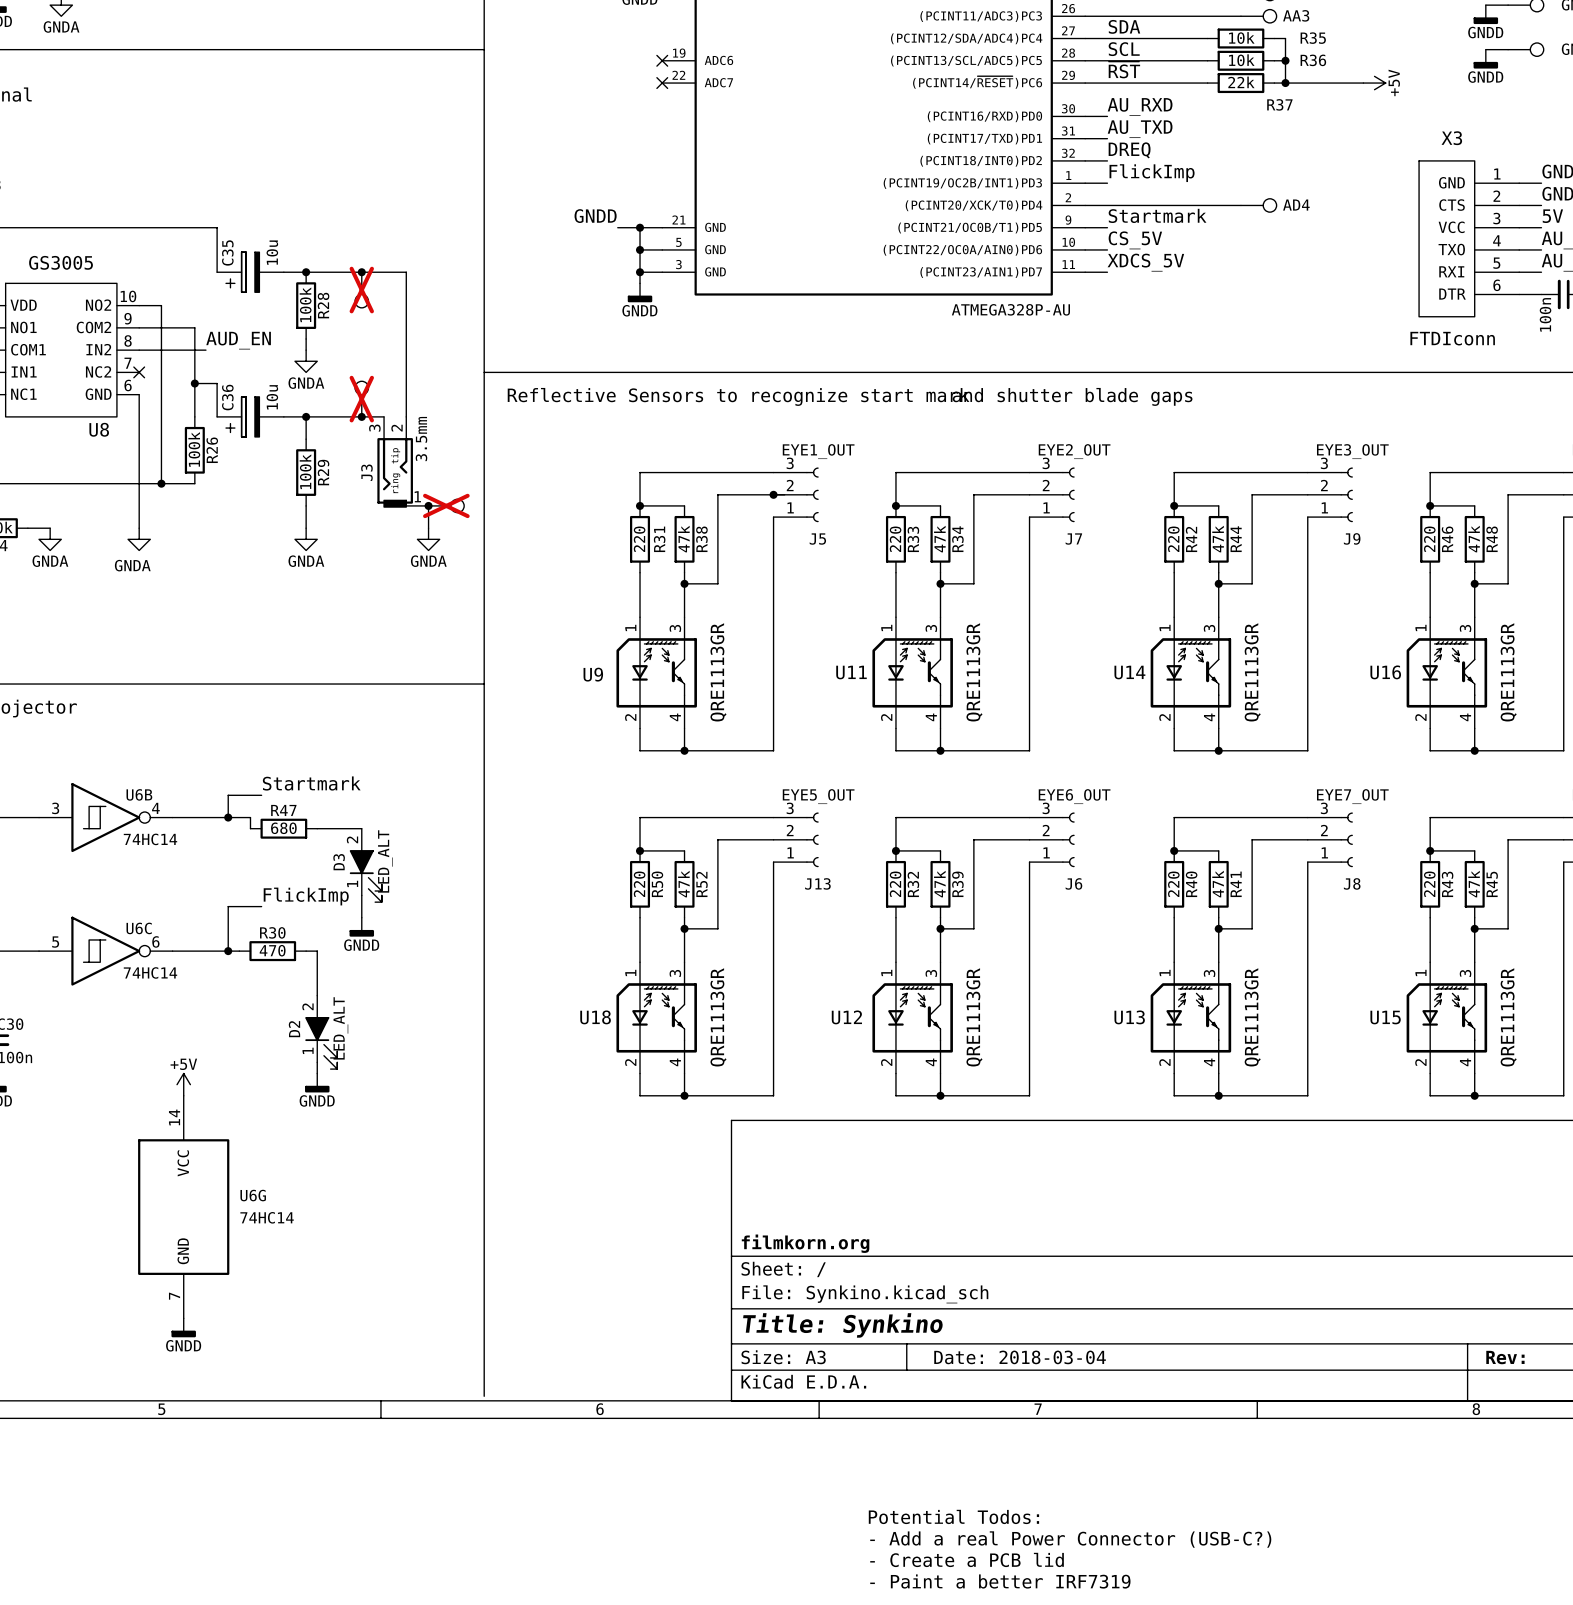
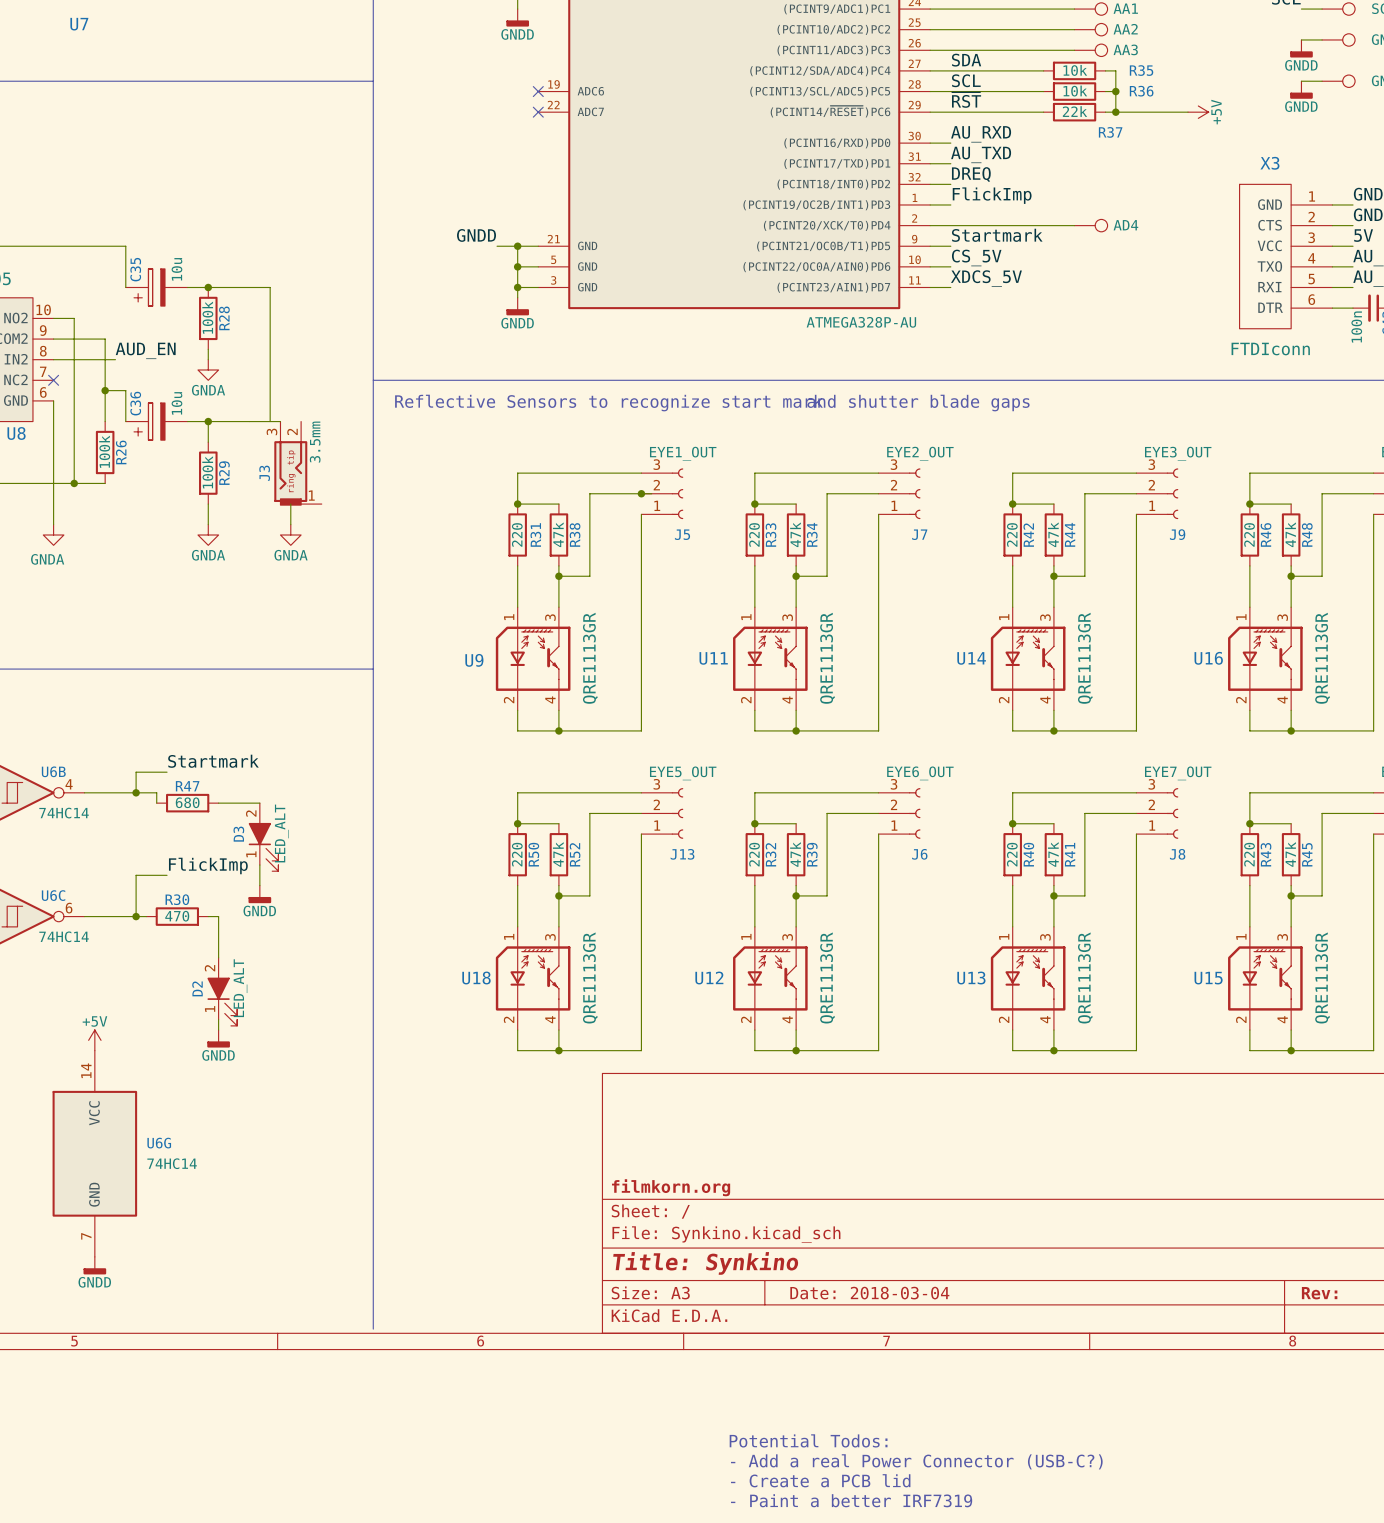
junction: (361, 272) -> none
wire: (372, 272) (406, 272) (406, 416) -> (270, 287) (270, 421)
part: (361, 290) -> none
part: (361, 399) -> none
junction: (361, 416) -> none
wire: (428, 505) (428, 528) -> (290, 504) (290, 524)
junction: (428, 505) -> none
part: (446, 505) -> none
power symbol position: GNDA (428, 539) -> GNDA (290, 535)

